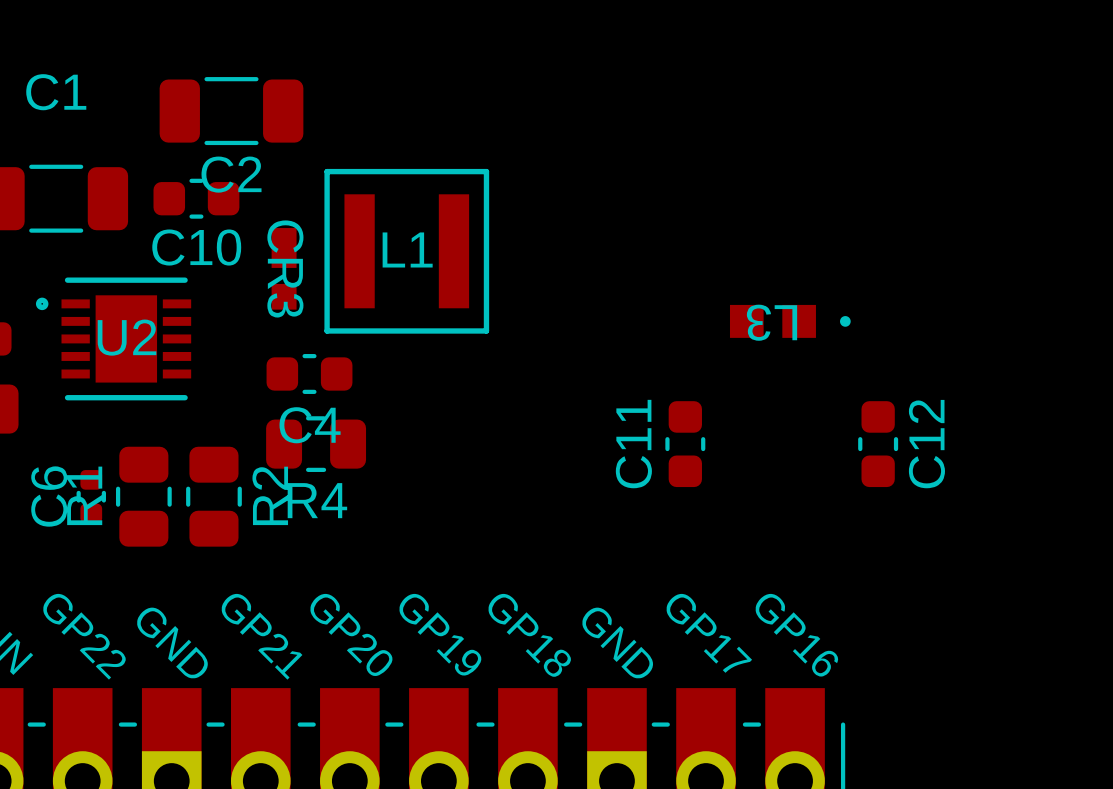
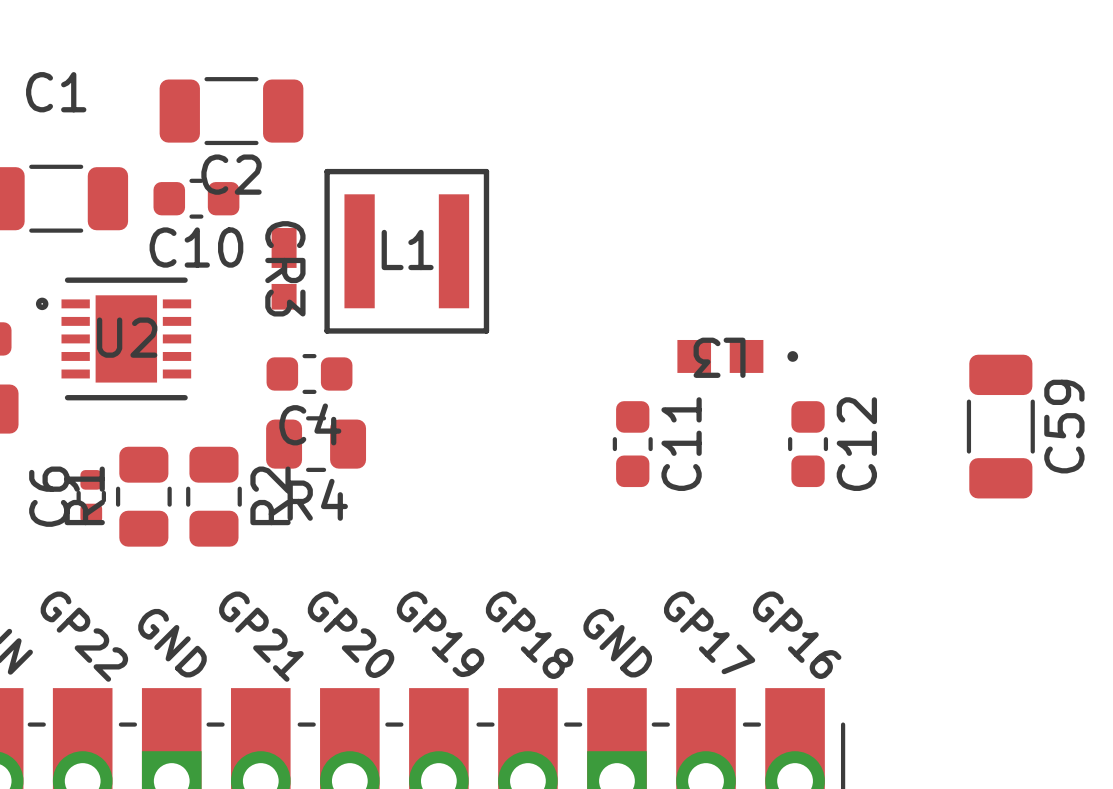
L3 position: (790, 321) -> (737, 356)
C59: none -> (1000, 426)
C11 name position: C11 (633, 444) -> C11 (681, 444)
C11 position: (685, 444) -> (632, 444)
C12 position: (878, 444) -> (808, 444)

